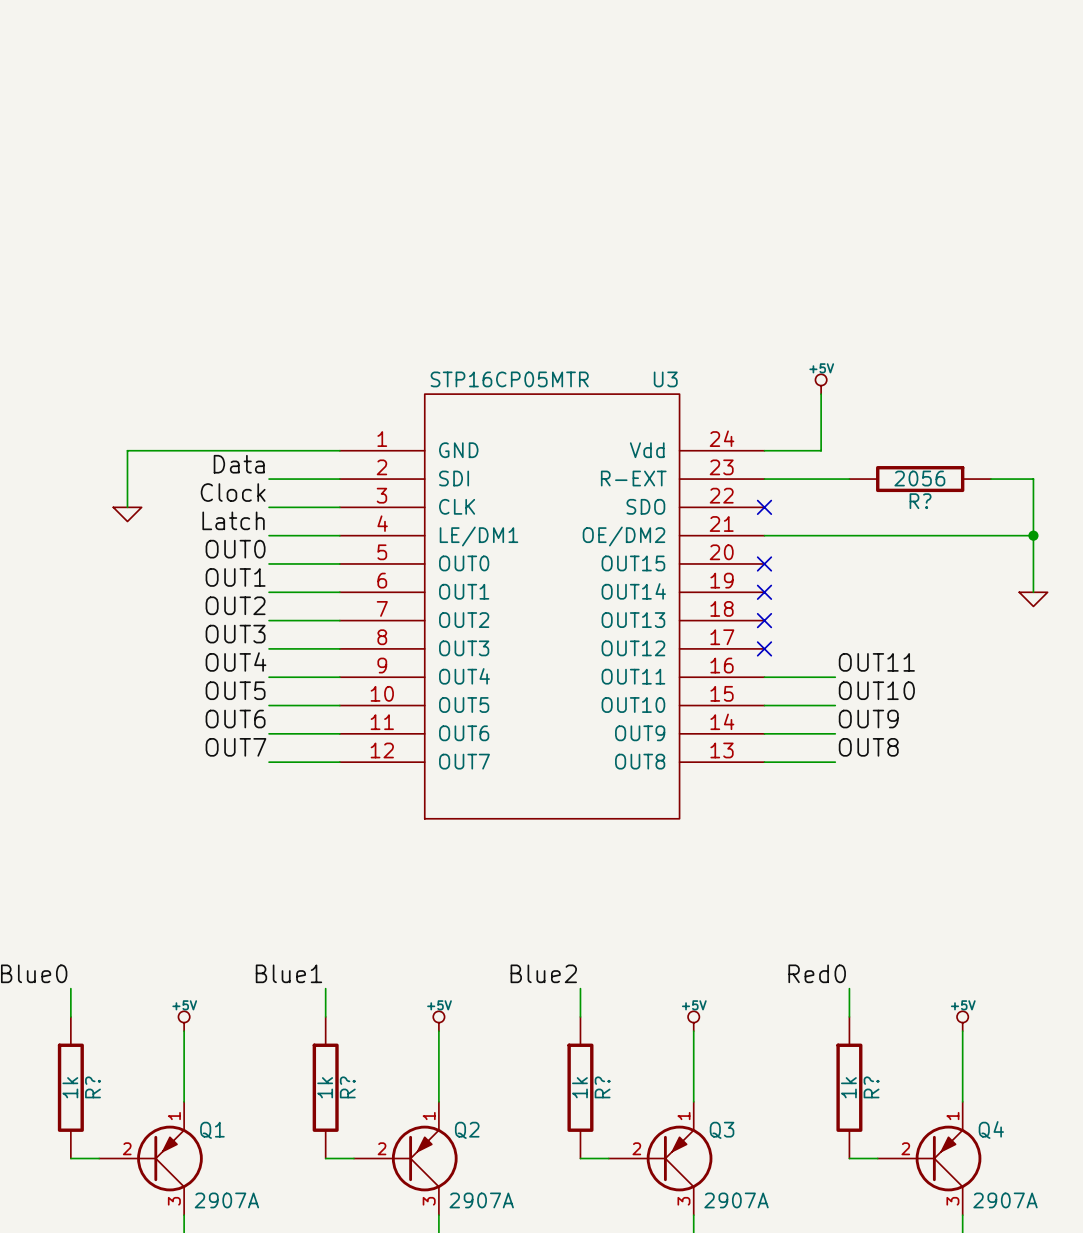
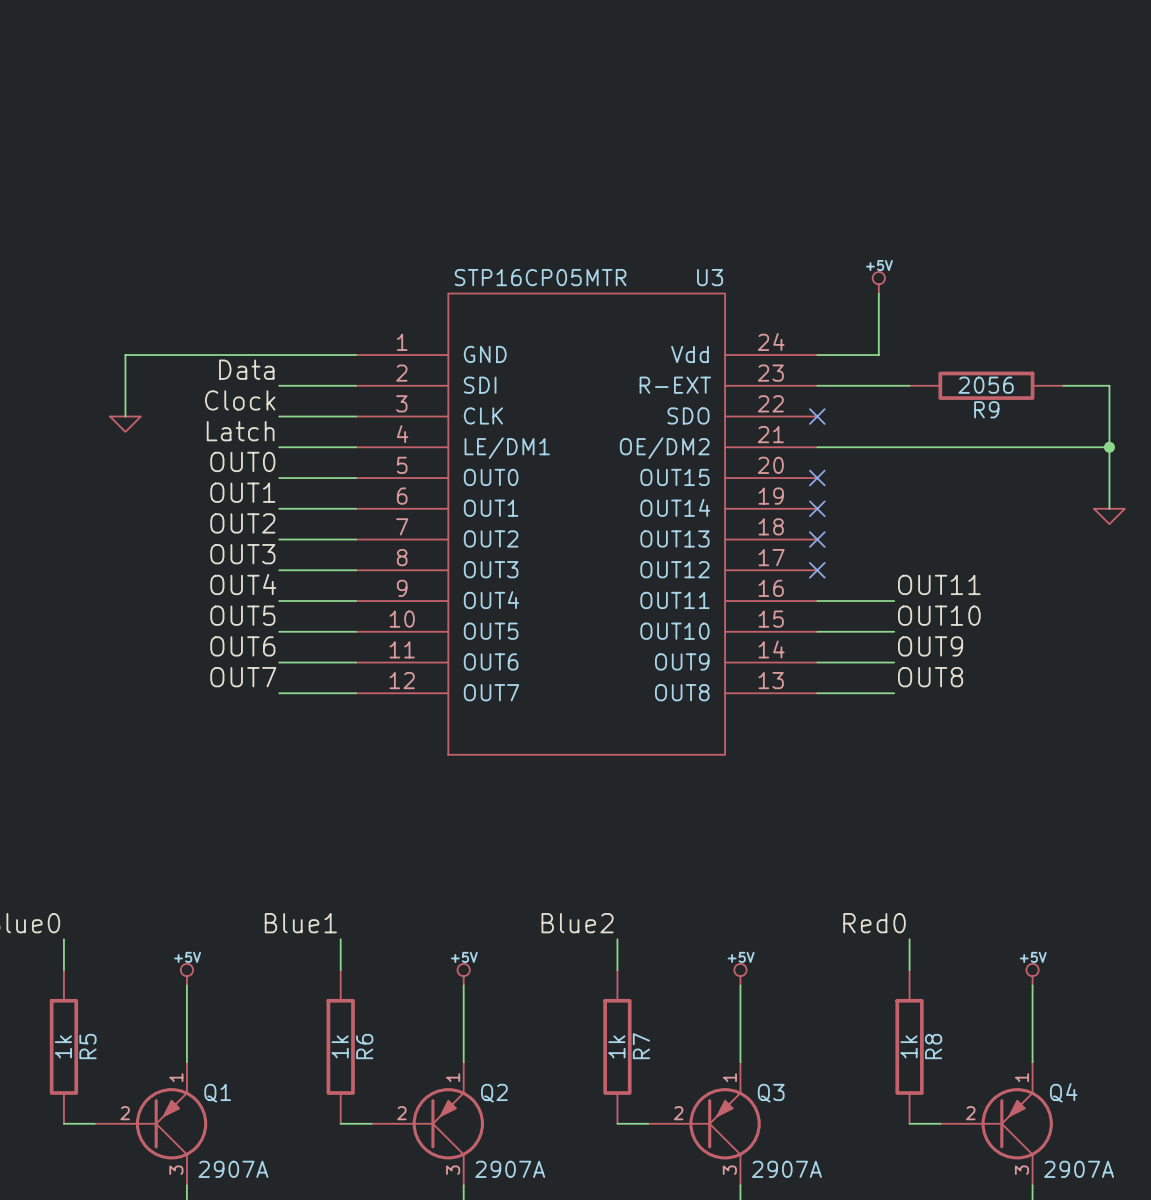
R? name: R? (920, 501) -> R9 (986, 409)
R? name: R? (92, 1087) -> R5 (87, 1046)
R? name: R? (347, 1087) -> R6 (364, 1046)
R? name: R? (602, 1087) -> R7 (641, 1046)
R? name: R? (871, 1087) -> R8 (933, 1046)

